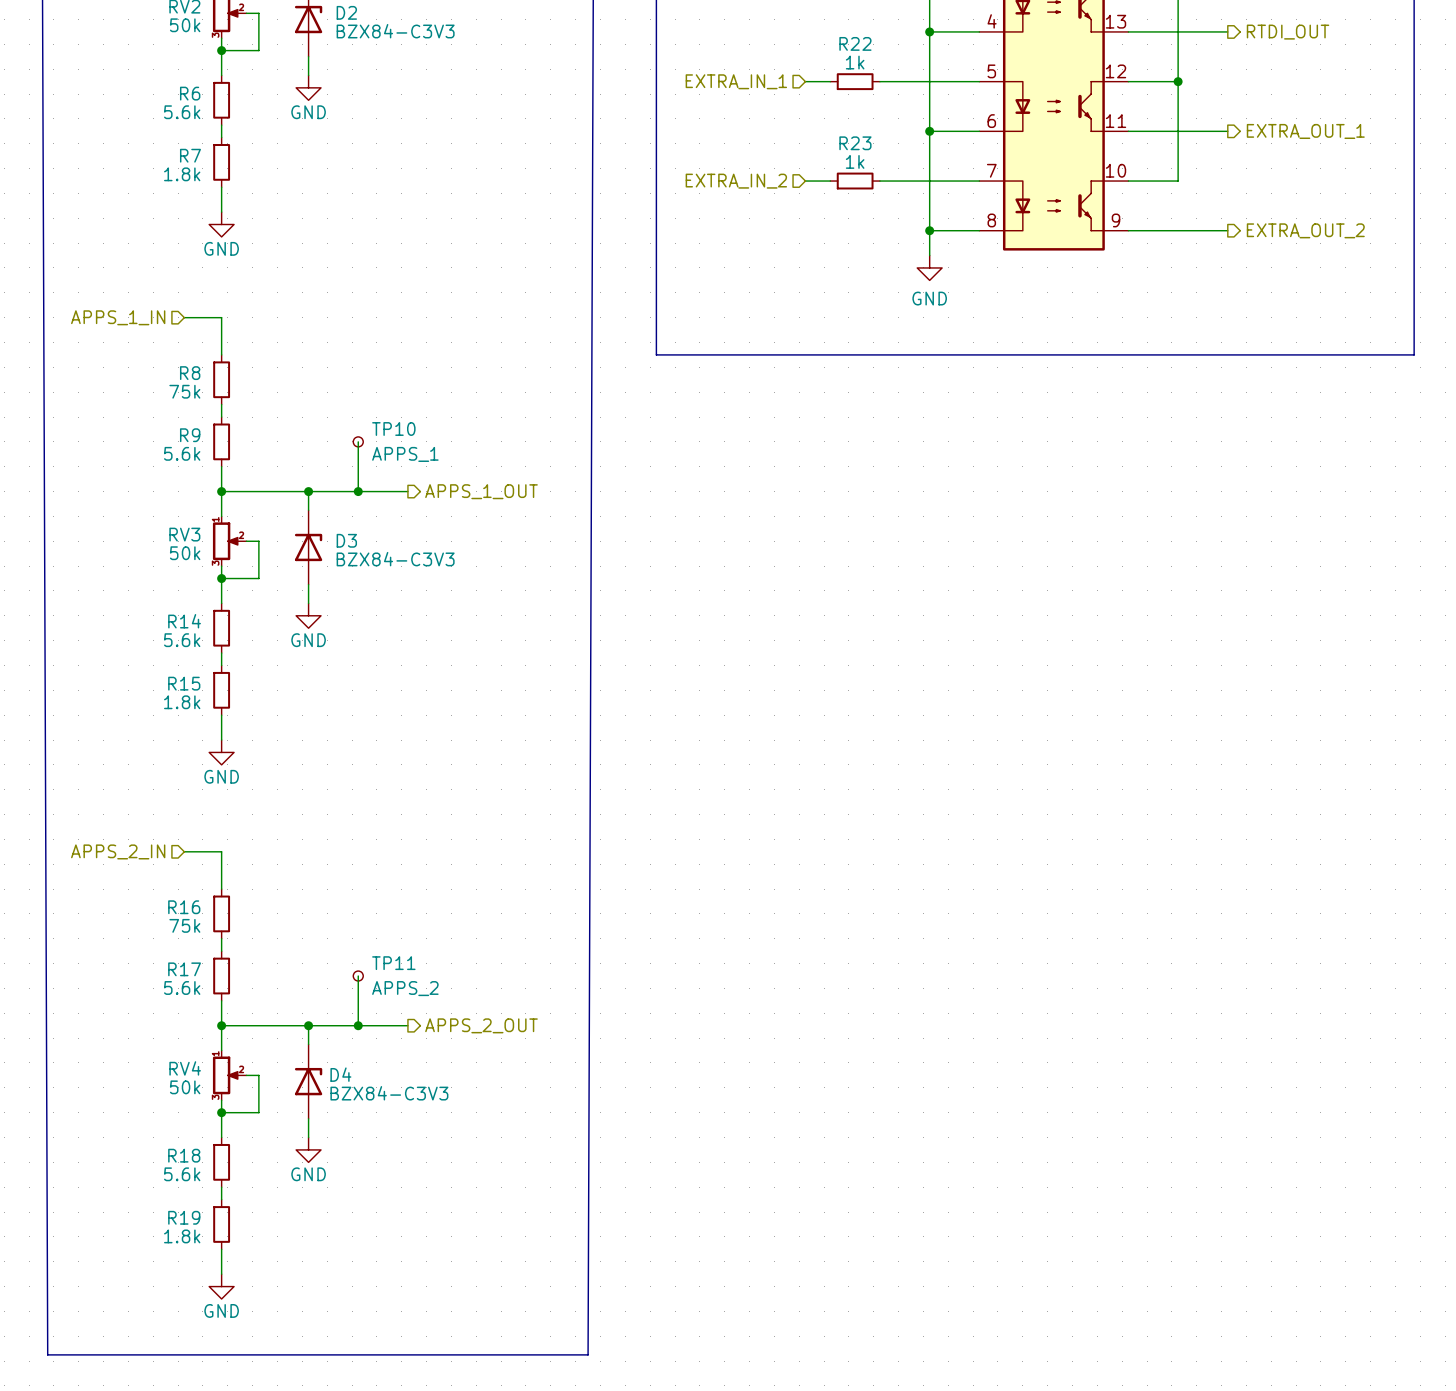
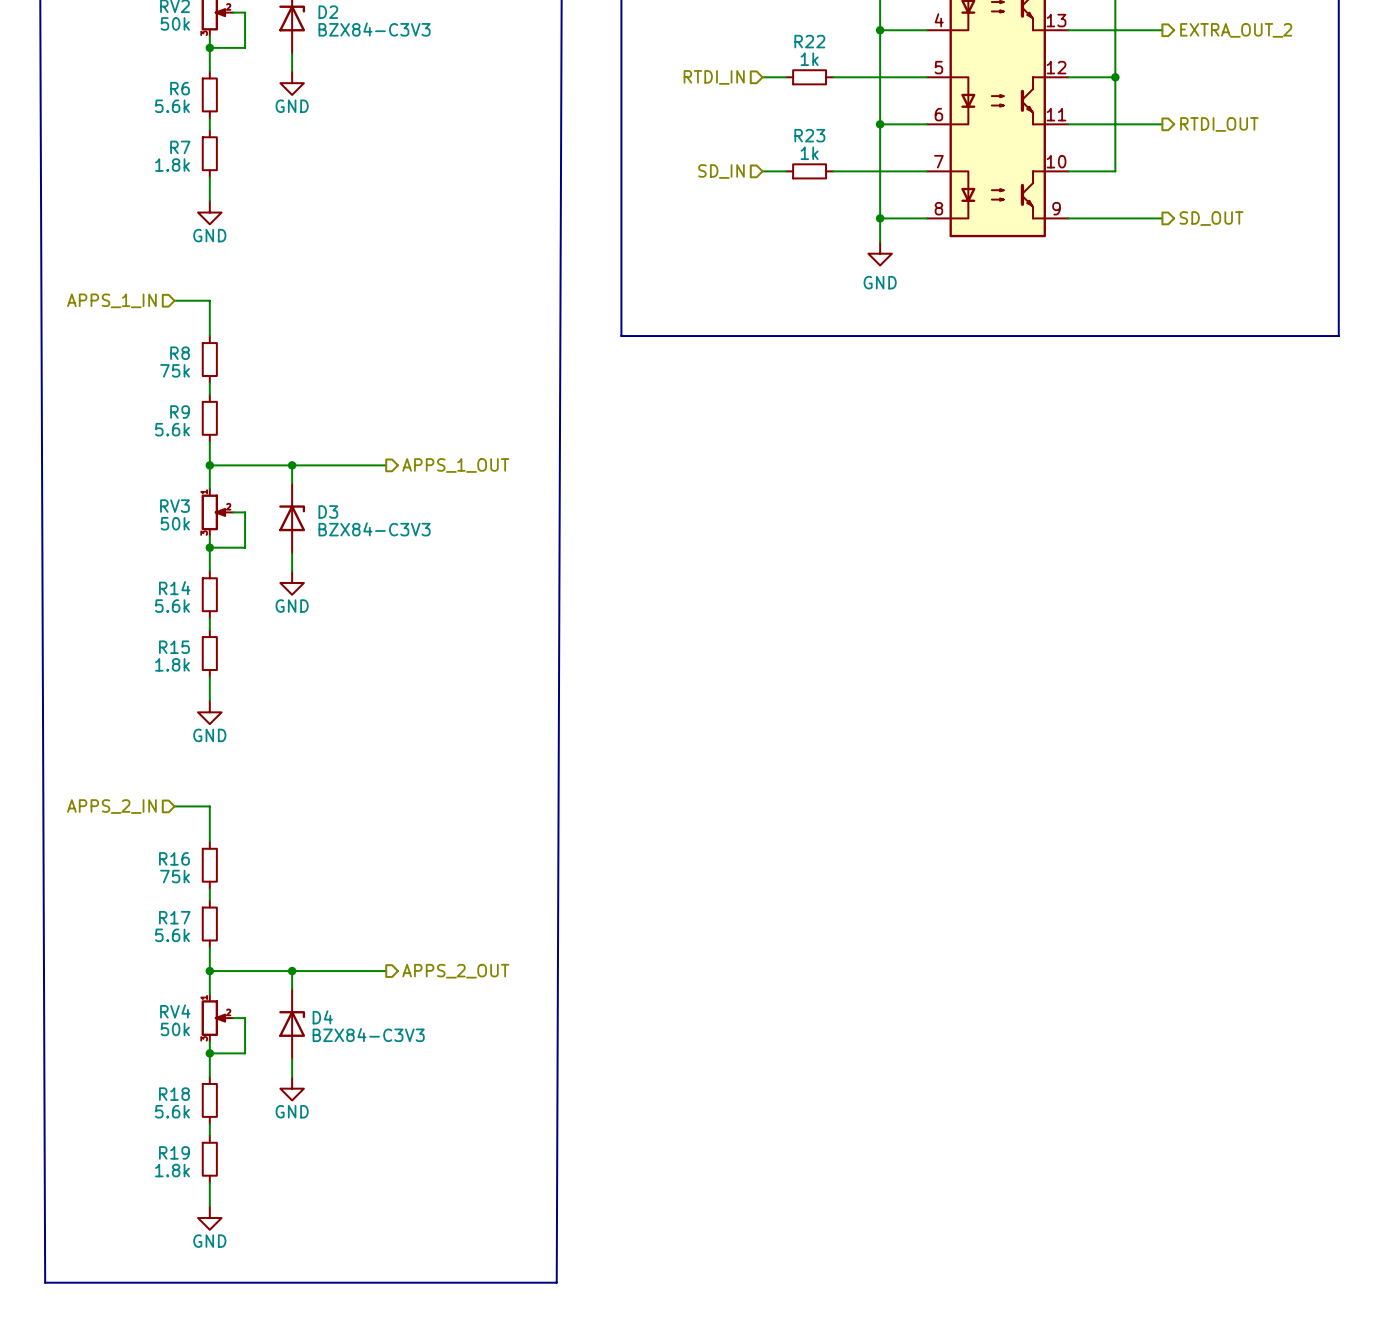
hierarchical label: RTDI_OUT (1288, 32) -> EXTRA_OUT_2 (1236, 30)
hierarchical label: EXTRA_IN_1 (736, 81) -> RTDI_IN (714, 77)
hierarchical label: EXTRA_OUT_1 (1305, 131) -> RTDI_OUT (1219, 124)
hierarchical label: EXTRA_IN_2 (736, 181) -> SD_IN (721, 171)
hierarchical label: EXTRA_OUT_2 (1305, 230) -> SD_OUT (1211, 218)
wire: (358, 441) (358, 491) -> none
TP10: APPS_1 (358, 441) -> none
junction: (358, 491) -> none
wire: (358, 976) (358, 1025) -> none
TP11: APPS_2 (358, 976) -> none
junction: (358, 1025) -> none

